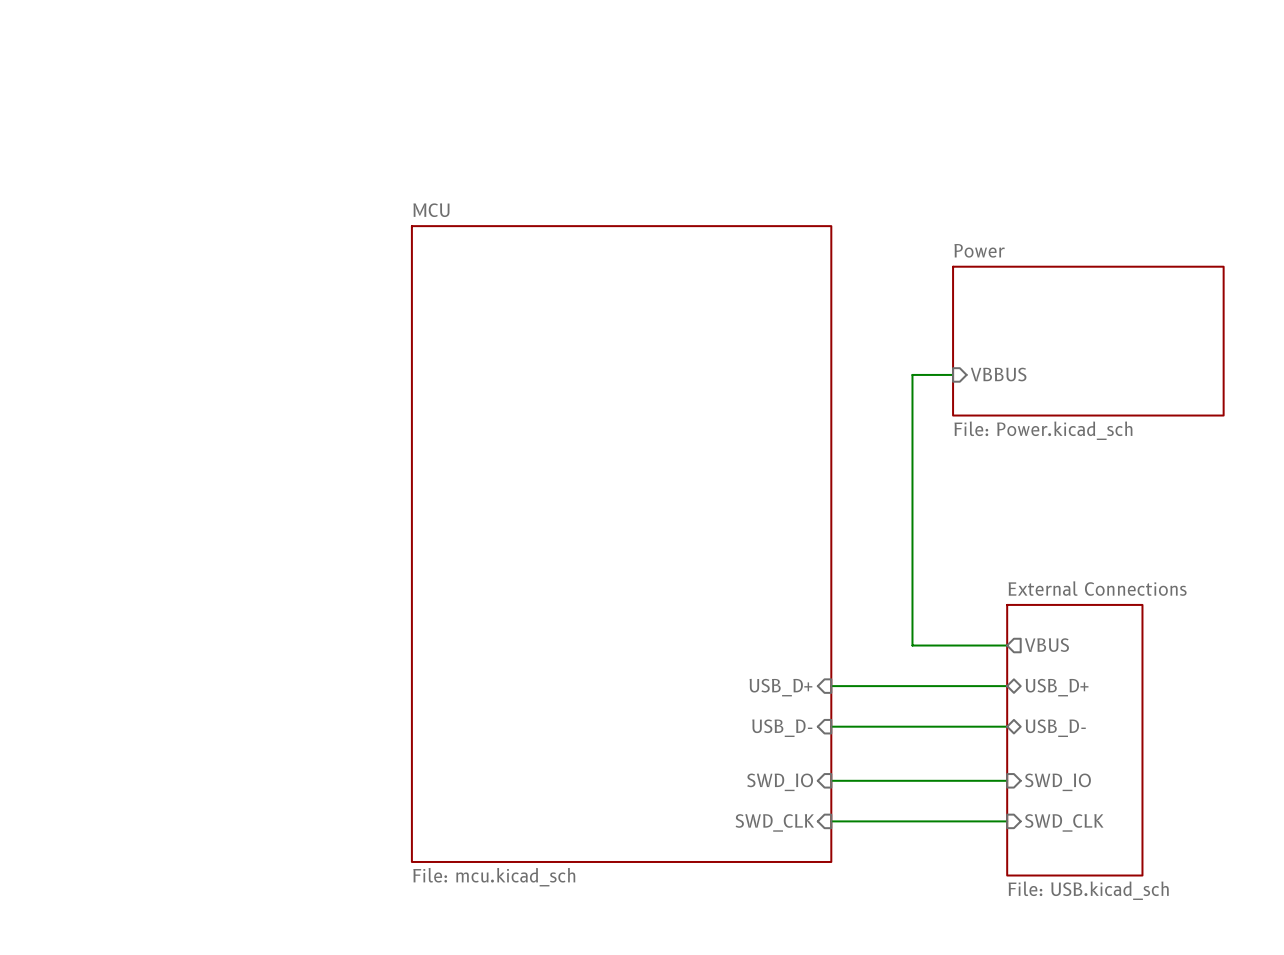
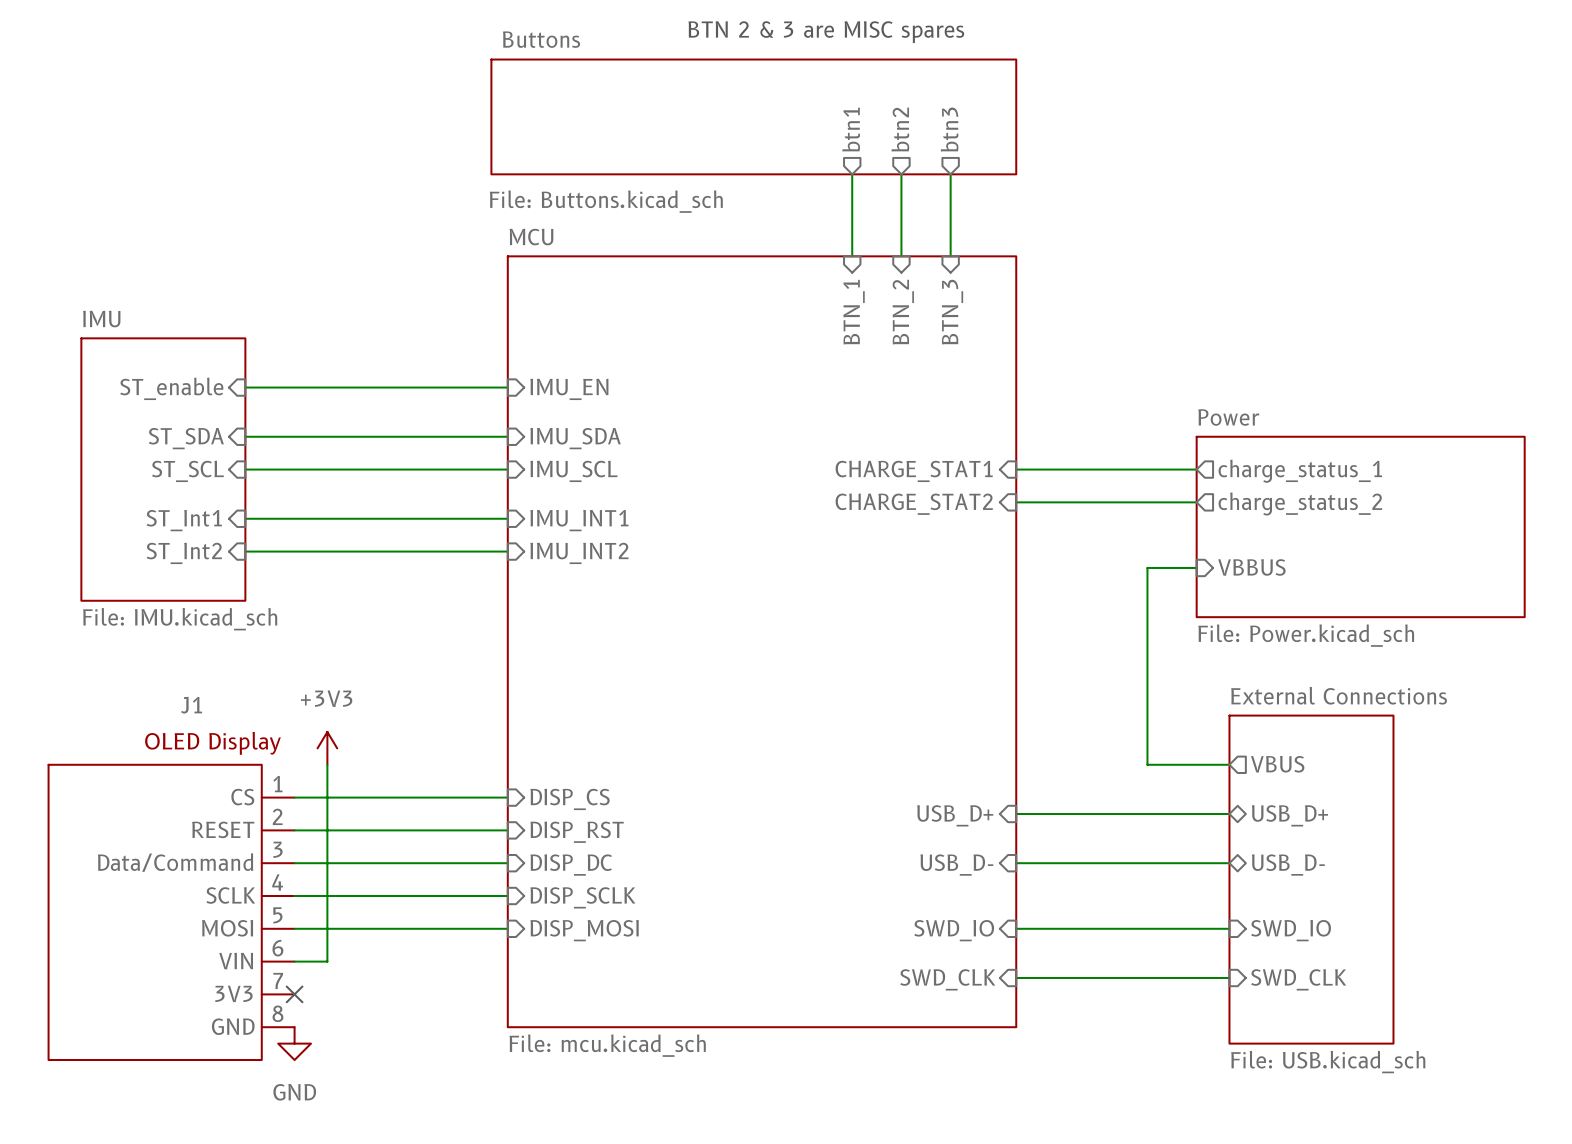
text: none -> BTN 2 & 3 are MISC spares (826, 32)
sheet Buttons: none -> File: Buttons.kicad_sch (753, 116)
sheet pin: none -> btn1 (851, 129)
sheet pin: none -> btn2 (900, 129)
sheet pin: none -> btn3 (949, 129)
wire: none -> (852, 174) (852, 256)
wire: none -> (901, 174) (901, 256)
wire: none -> (950, 174) (950, 256)
sheet pin: none -> BTN_1 (854, 312)
sheet pin: none -> BTN_2 (903, 312)
sheet pin: none -> BTN_3 (952, 312)
wire: none -> (245, 387) (507, 387)
sheet pin: none -> ST_enable (171, 388)
sheet pin: none -> IMU_EN (569, 389)
sheet Power position: (1088, 341) -> (1360, 526)
wire: none -> (245, 436) (507, 436)
wire: (953, 374) (912, 374) (912, 645) (939, 645) -> (1196, 567) (1147, 567) (1147, 764)
sheet pin position: VBBUS (998, 374) -> VBBUS (1251, 567)
sheet pin: none -> ST_SDA (186, 438)
sheet pin: none -> IMU_SDA (575, 438)
sheet IMU: none -> File: IMU.kicad_sch (163, 469)
wire: none -> (245, 469) (507, 469)
wire: none -> (1016, 469) (1196, 469)
sheet pin: none -> ST_SCL (187, 471)
sheet pin: none -> IMU_SCL (573, 471)
sheet pin: none -> CHARGE_STAT1 (914, 471)
sheet pin: none -> charge_status_1 (1300, 471)
wire: none -> (1016, 502) (1196, 502)
sheet pin: none -> CHARGE_STAT2 (914, 504)
sheet pin: none -> charge_status_2 (1300, 504)
wire: none -> (245, 518) (507, 518)
sheet pin: none -> ST_Int1 (184, 520)
sheet pin: none -> IMU_INT1 (579, 520)
wire: none -> (245, 551) (507, 551)
sheet pin: none -> ST_Int2 (184, 553)
sheet pin: none -> IMU_INT2 (579, 553)
power symbol: none -> +3V3 (327, 748)
wire: none -> (327, 764) (327, 961) (294, 961)
wire: none -> (294, 797) (507, 797)
sheet pin: none -> DISP_CS (570, 799)
wire: none -> (294, 830) (507, 830)
sheet pin: none -> DISP_RST (577, 832)
wire: none -> (294, 863) (507, 863)
sheet pin: none -> DISP_DC (571, 865)
wire: none -> (294, 895) (507, 895)
sheet pin: none -> DISP_SCLK (582, 897)
J1: none -> (171, 912)
wire: none -> (294, 928) (507, 928)
sheet pin: none -> DISP_MOSI (584, 930)
no-connect mark: none -> (294, 994)
power symbol: none -> GND (294, 1043)

